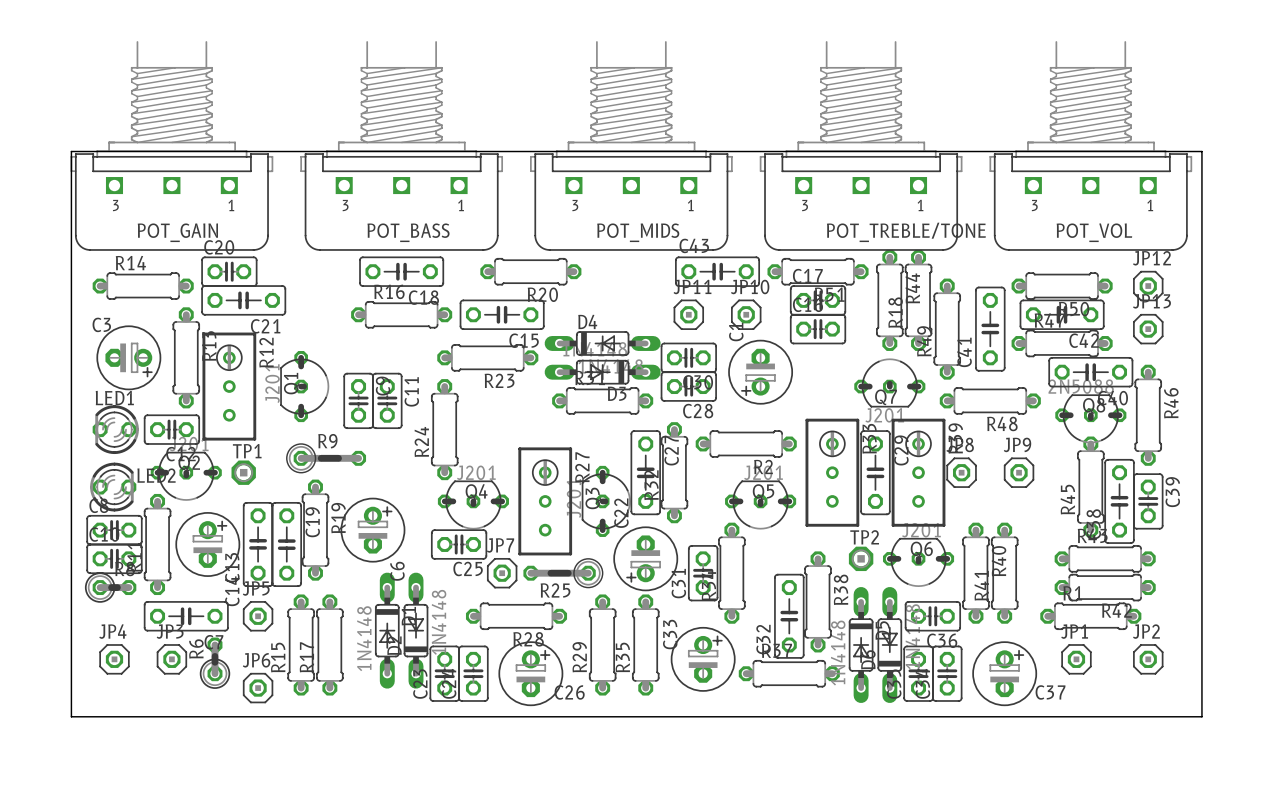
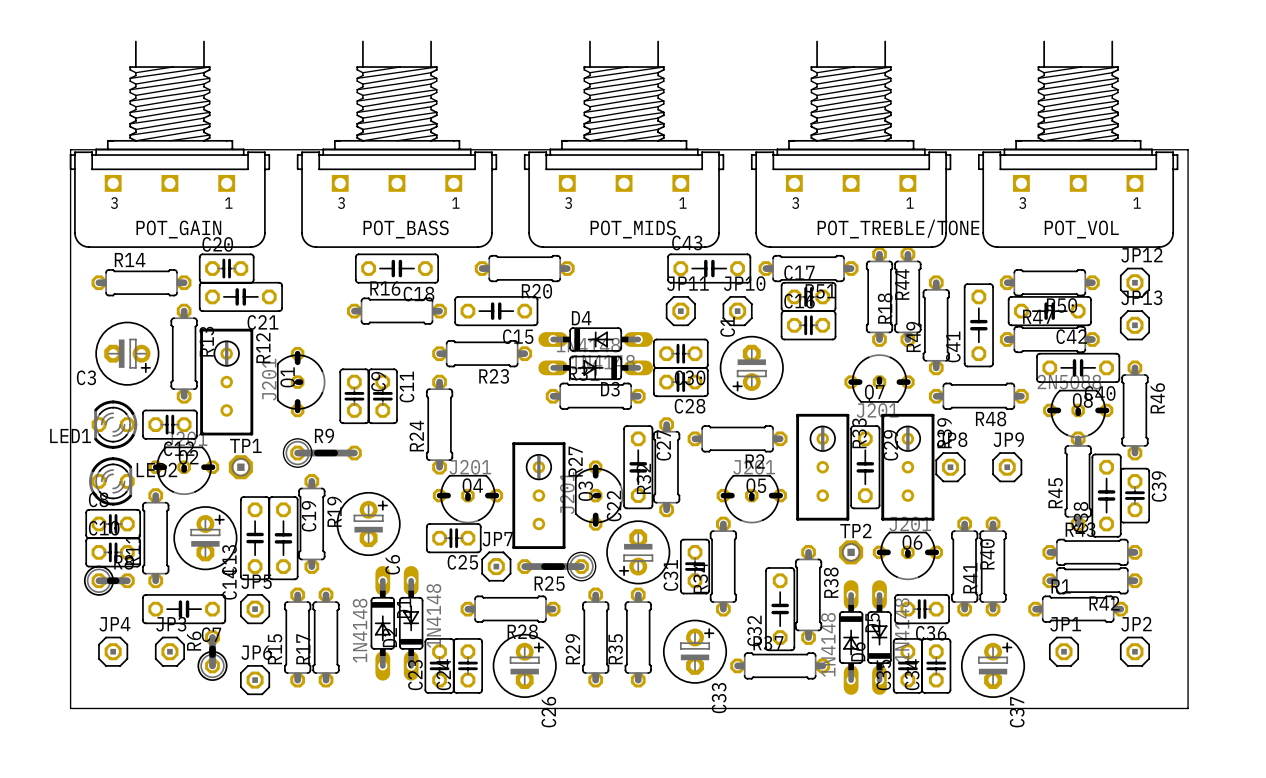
POT_GAIN footprint: [70, 41, 274, 251] -> [69, 40, 271, 248]
POT_BASS footprint: [300, 41, 504, 251] -> [296, 40, 498, 248]
POT_MIDS footprint: [530, 41, 733, 251] -> [523, 40, 725, 248]
POT_TREBLE/TONE footprint: [759, 41, 963, 251] -> [750, 40, 952, 248]
POT_VOL footprint: [989, 41, 1193, 251] -> [978, 40, 1179, 248]
C3 name position: C3 (101, 324) -> C3 (86, 377)
LED1 name position: LED1 (114, 398) -> LED1 (70, 436)
C33 name position: C33 (670, 634) -> C33 (719, 698)
C26 name rotation: 0° (569, 692) -> 90° counterclockwise (548, 712)
C37 name rotation: 0° (1050, 692) -> 90° counterclockwise (1017, 712)

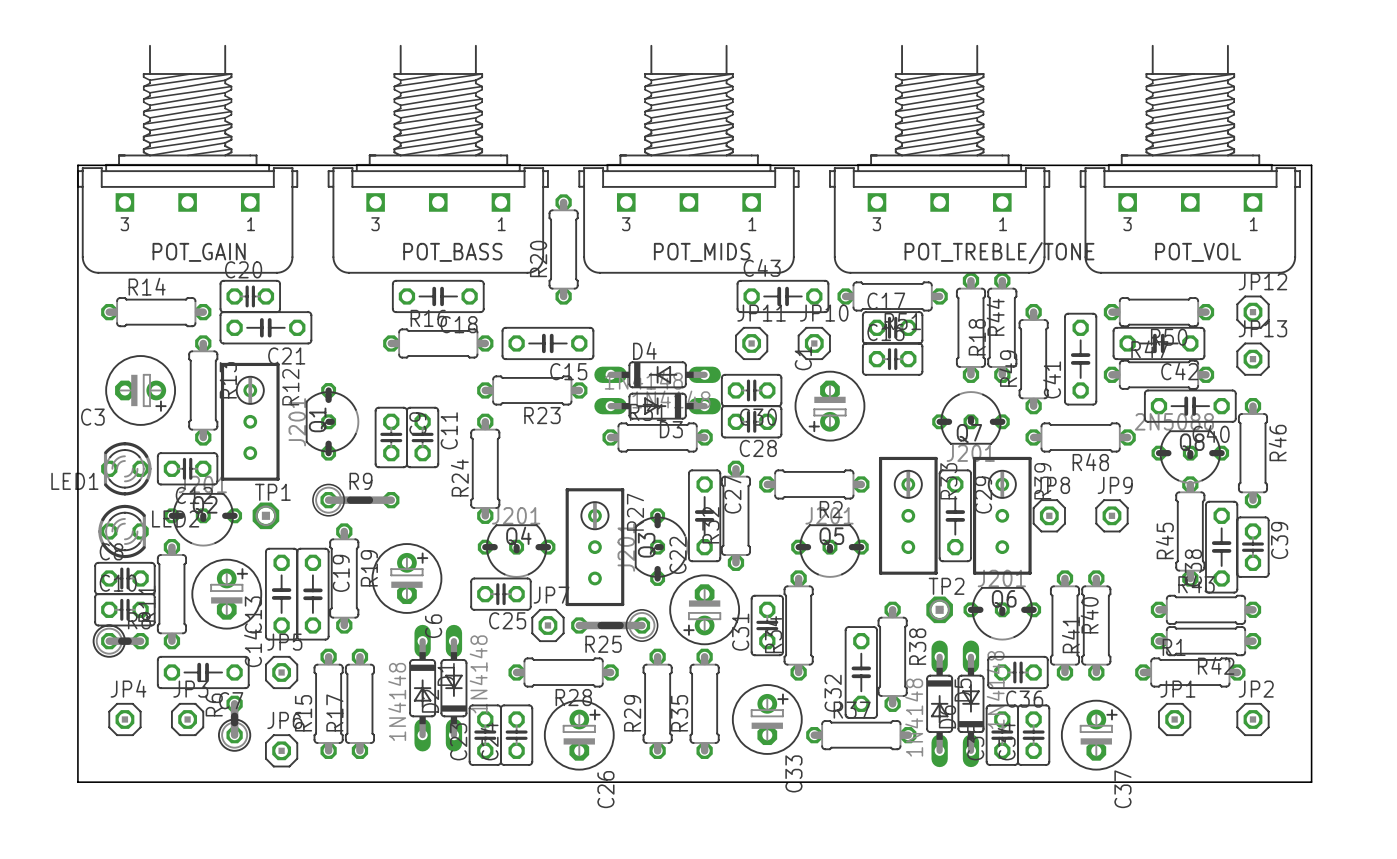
R20 rotation: 0° (524, 268) -> 90° clockwise (563, 249)

